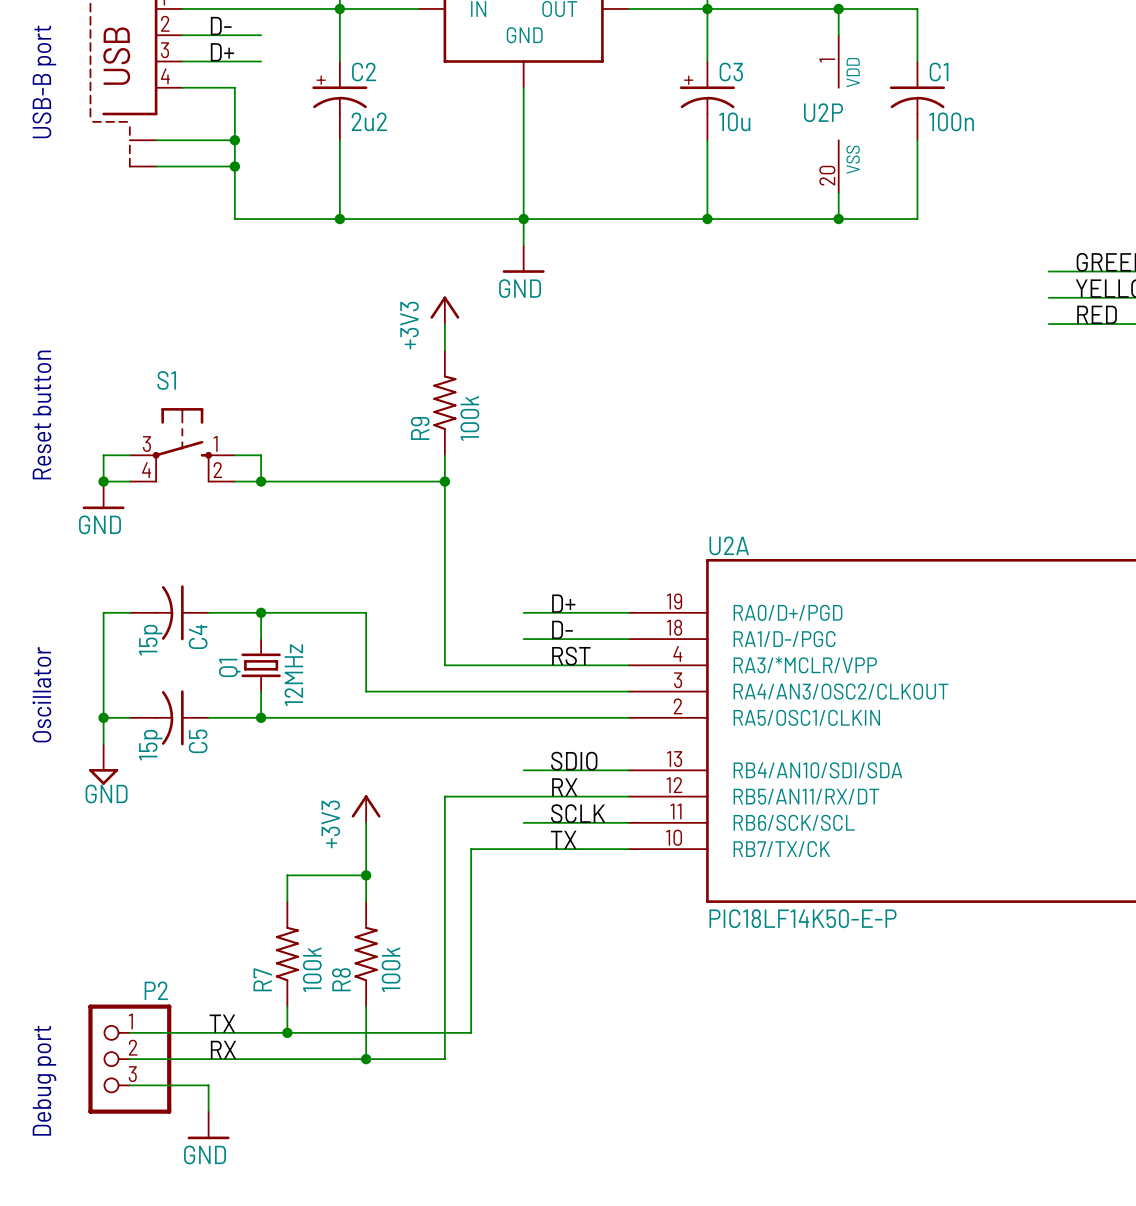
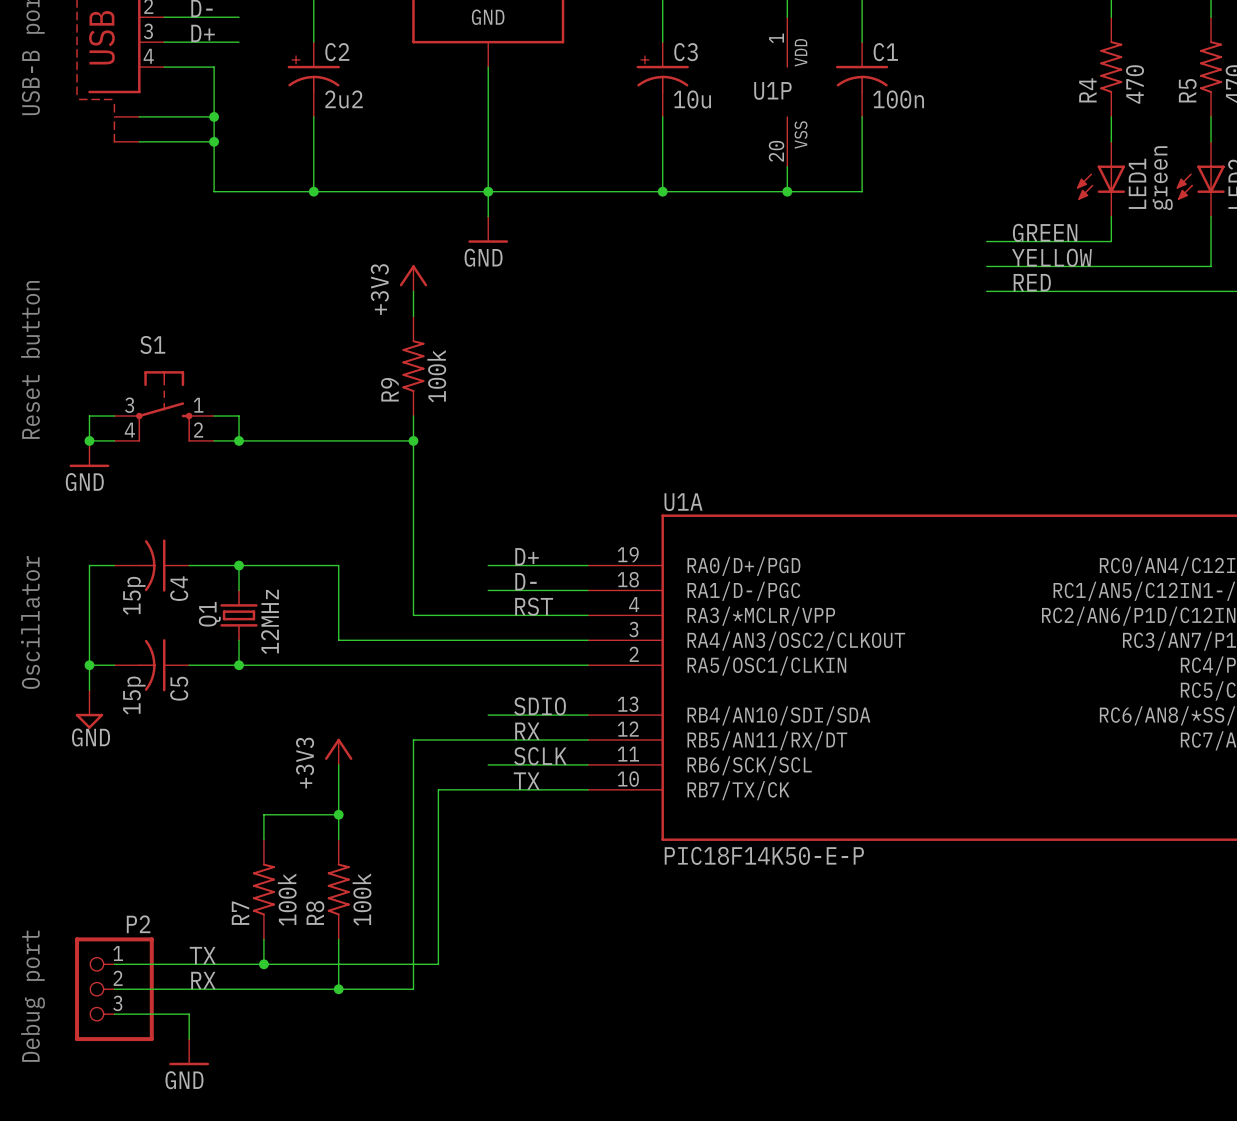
U2P name: U2P (823, 112) -> U1P (772, 90)
U2A name: U2A (729, 545) -> U1A (683, 502)
U2A value: PIC18LF14K50-E-P (803, 918) -> PIC18F14K50-E-P (764, 855)

